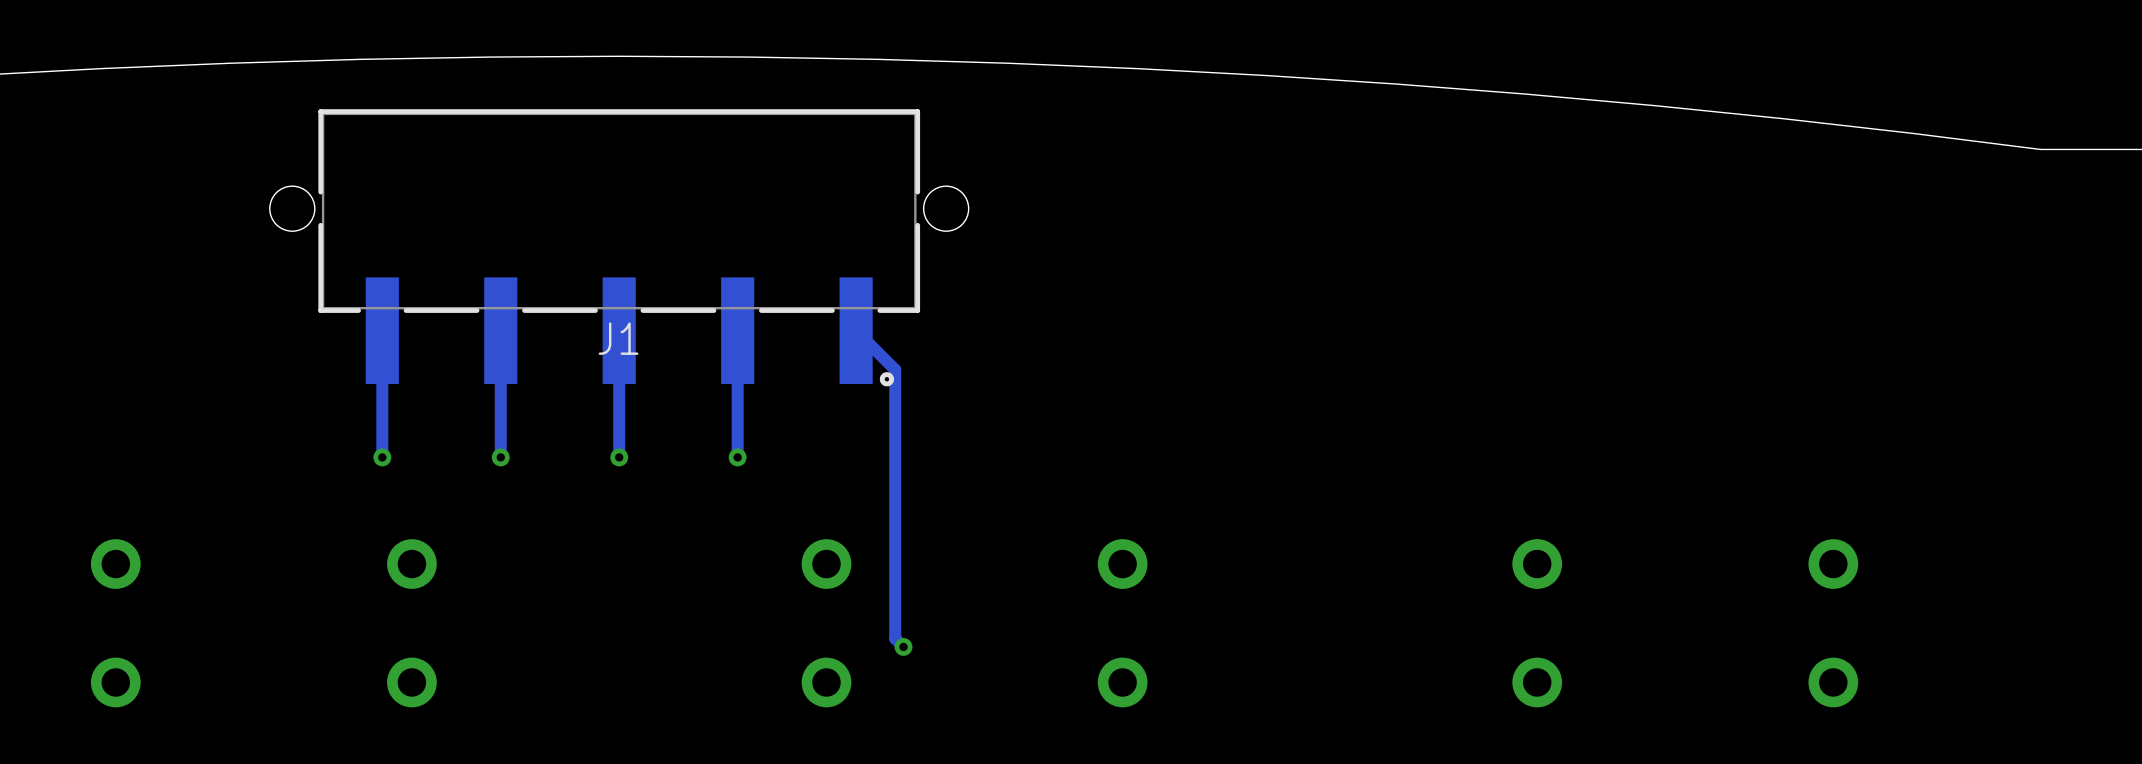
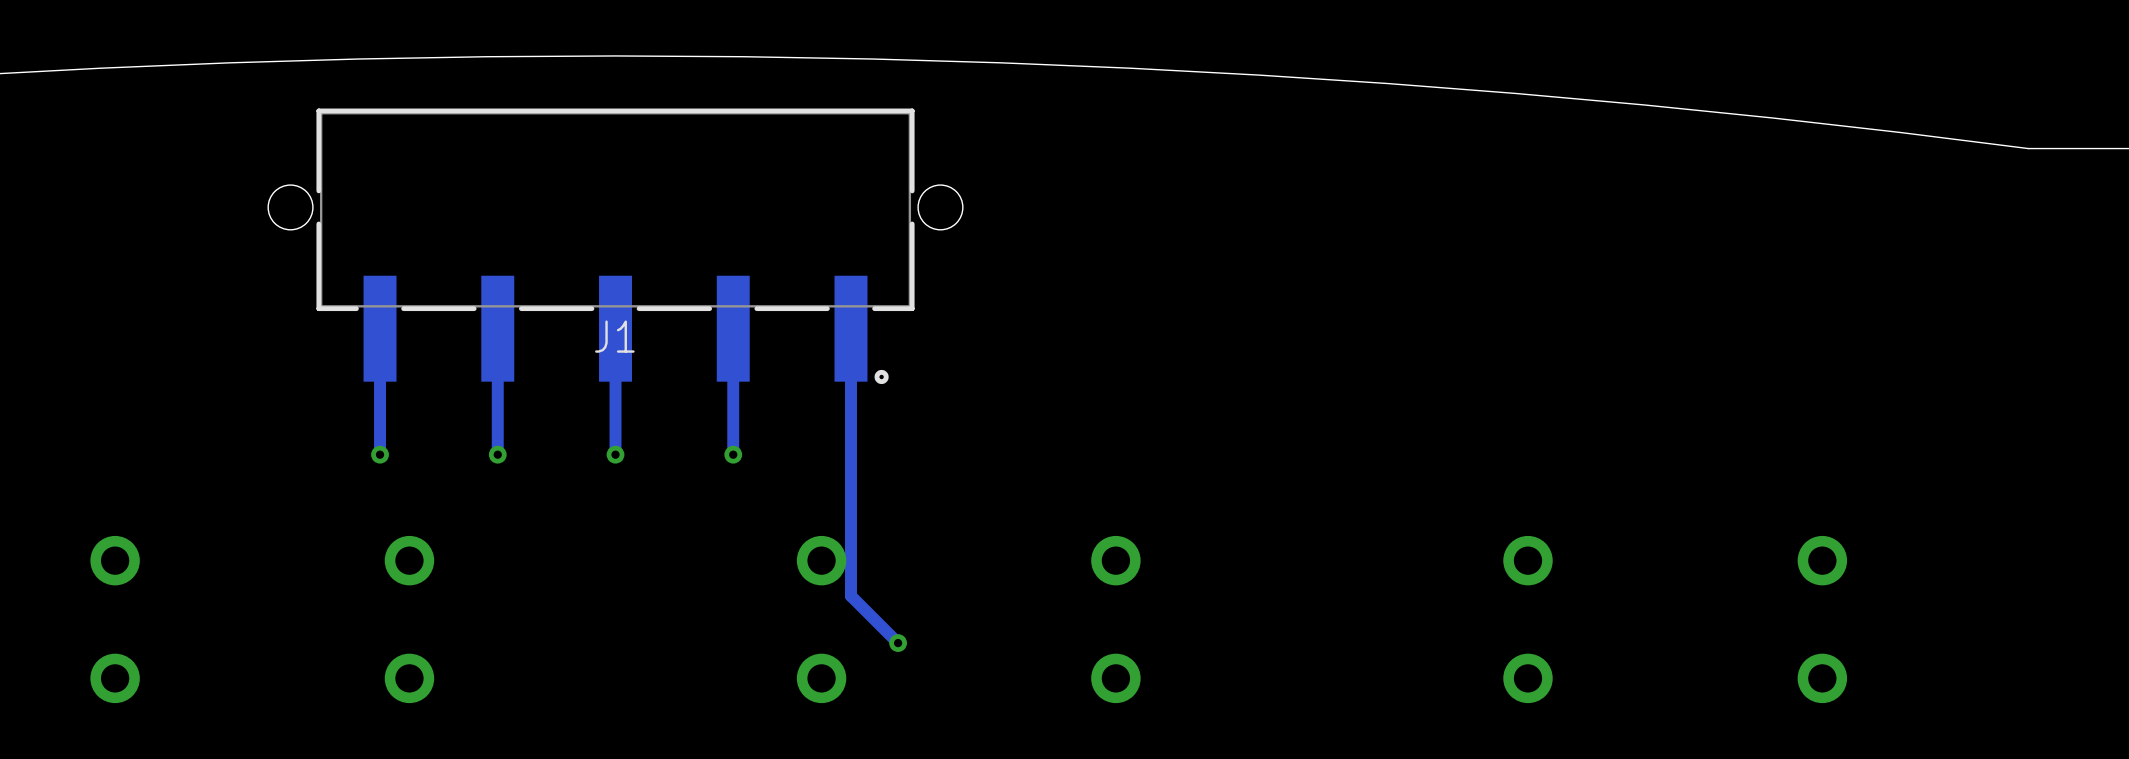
track: (856, 330) (895, 369) (895, 638) -> (850, 328) (850, 595) (889, 634)

